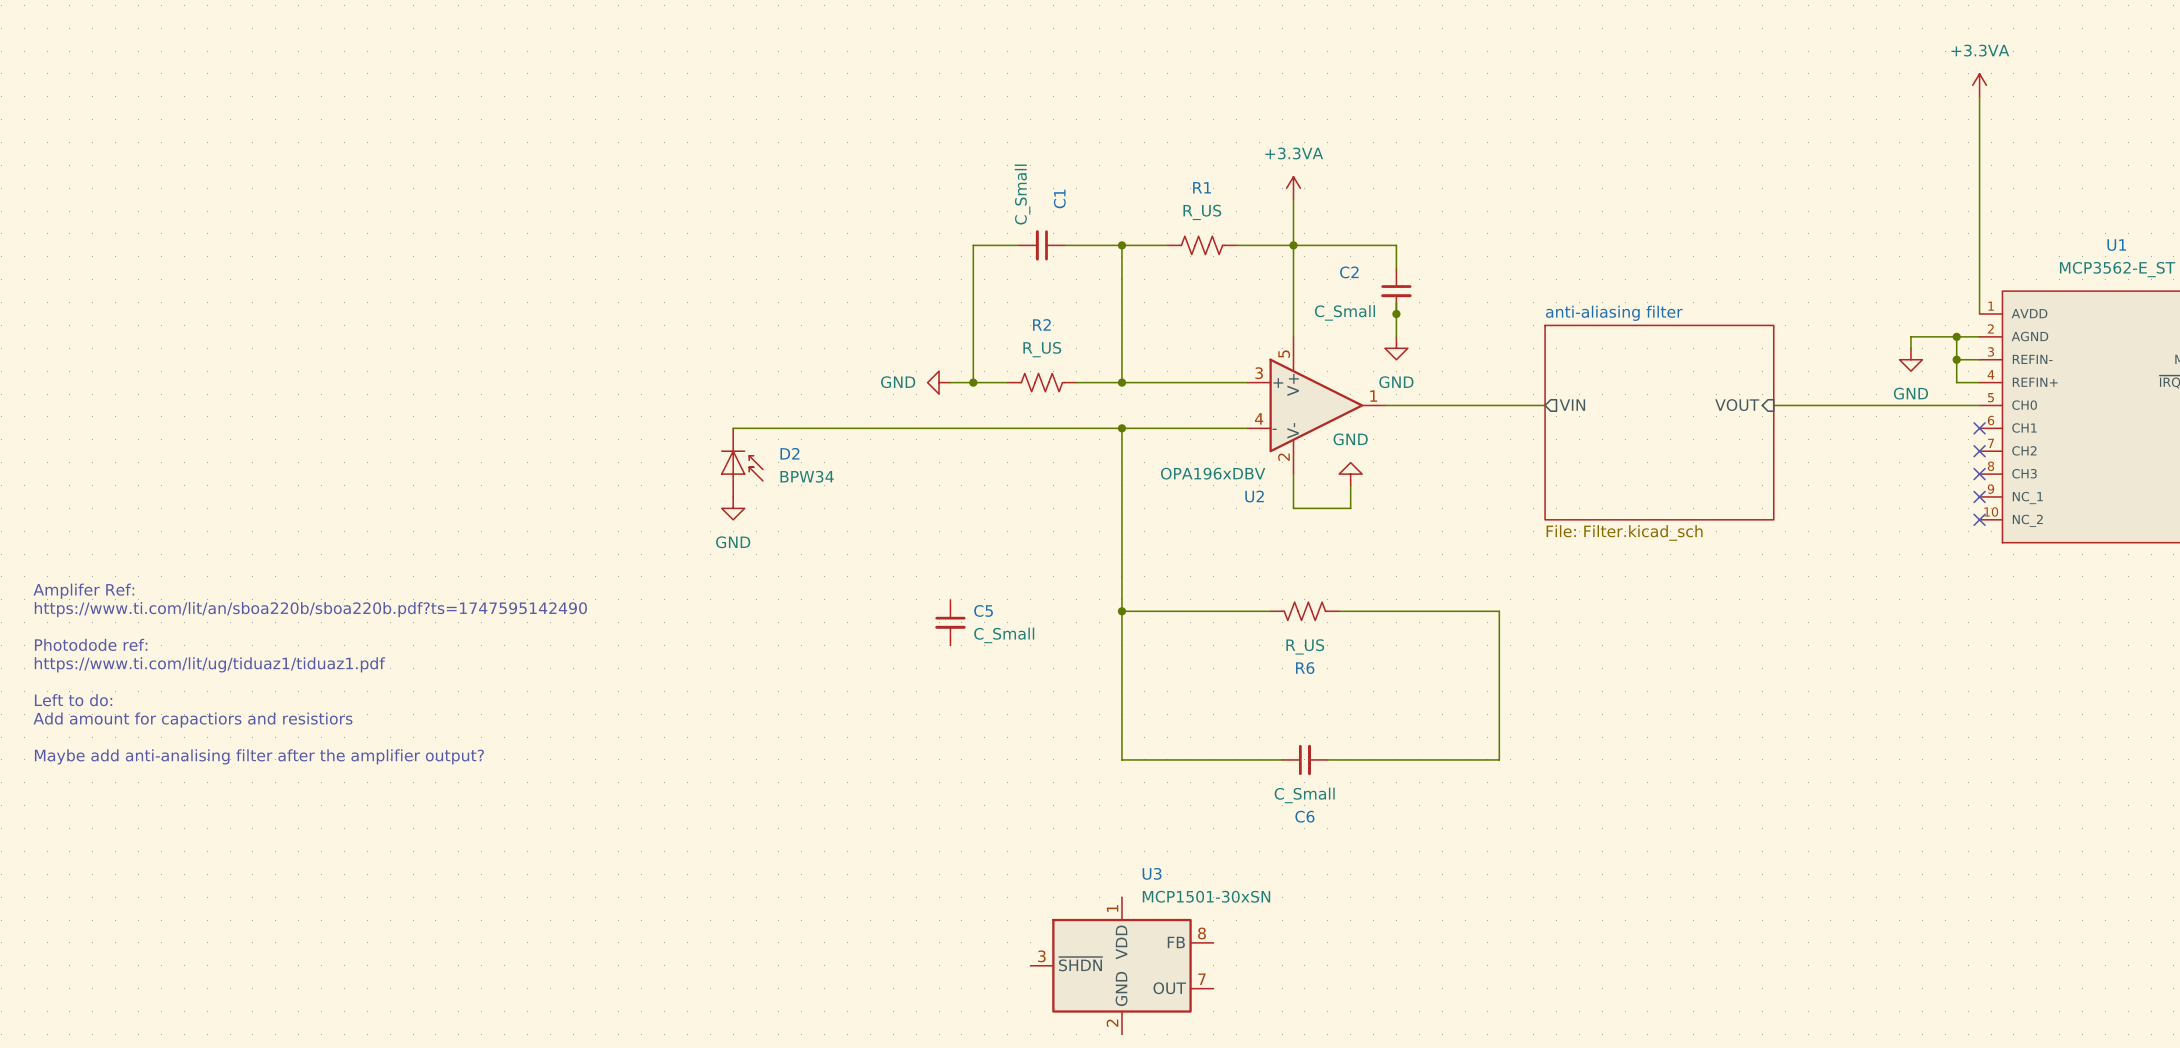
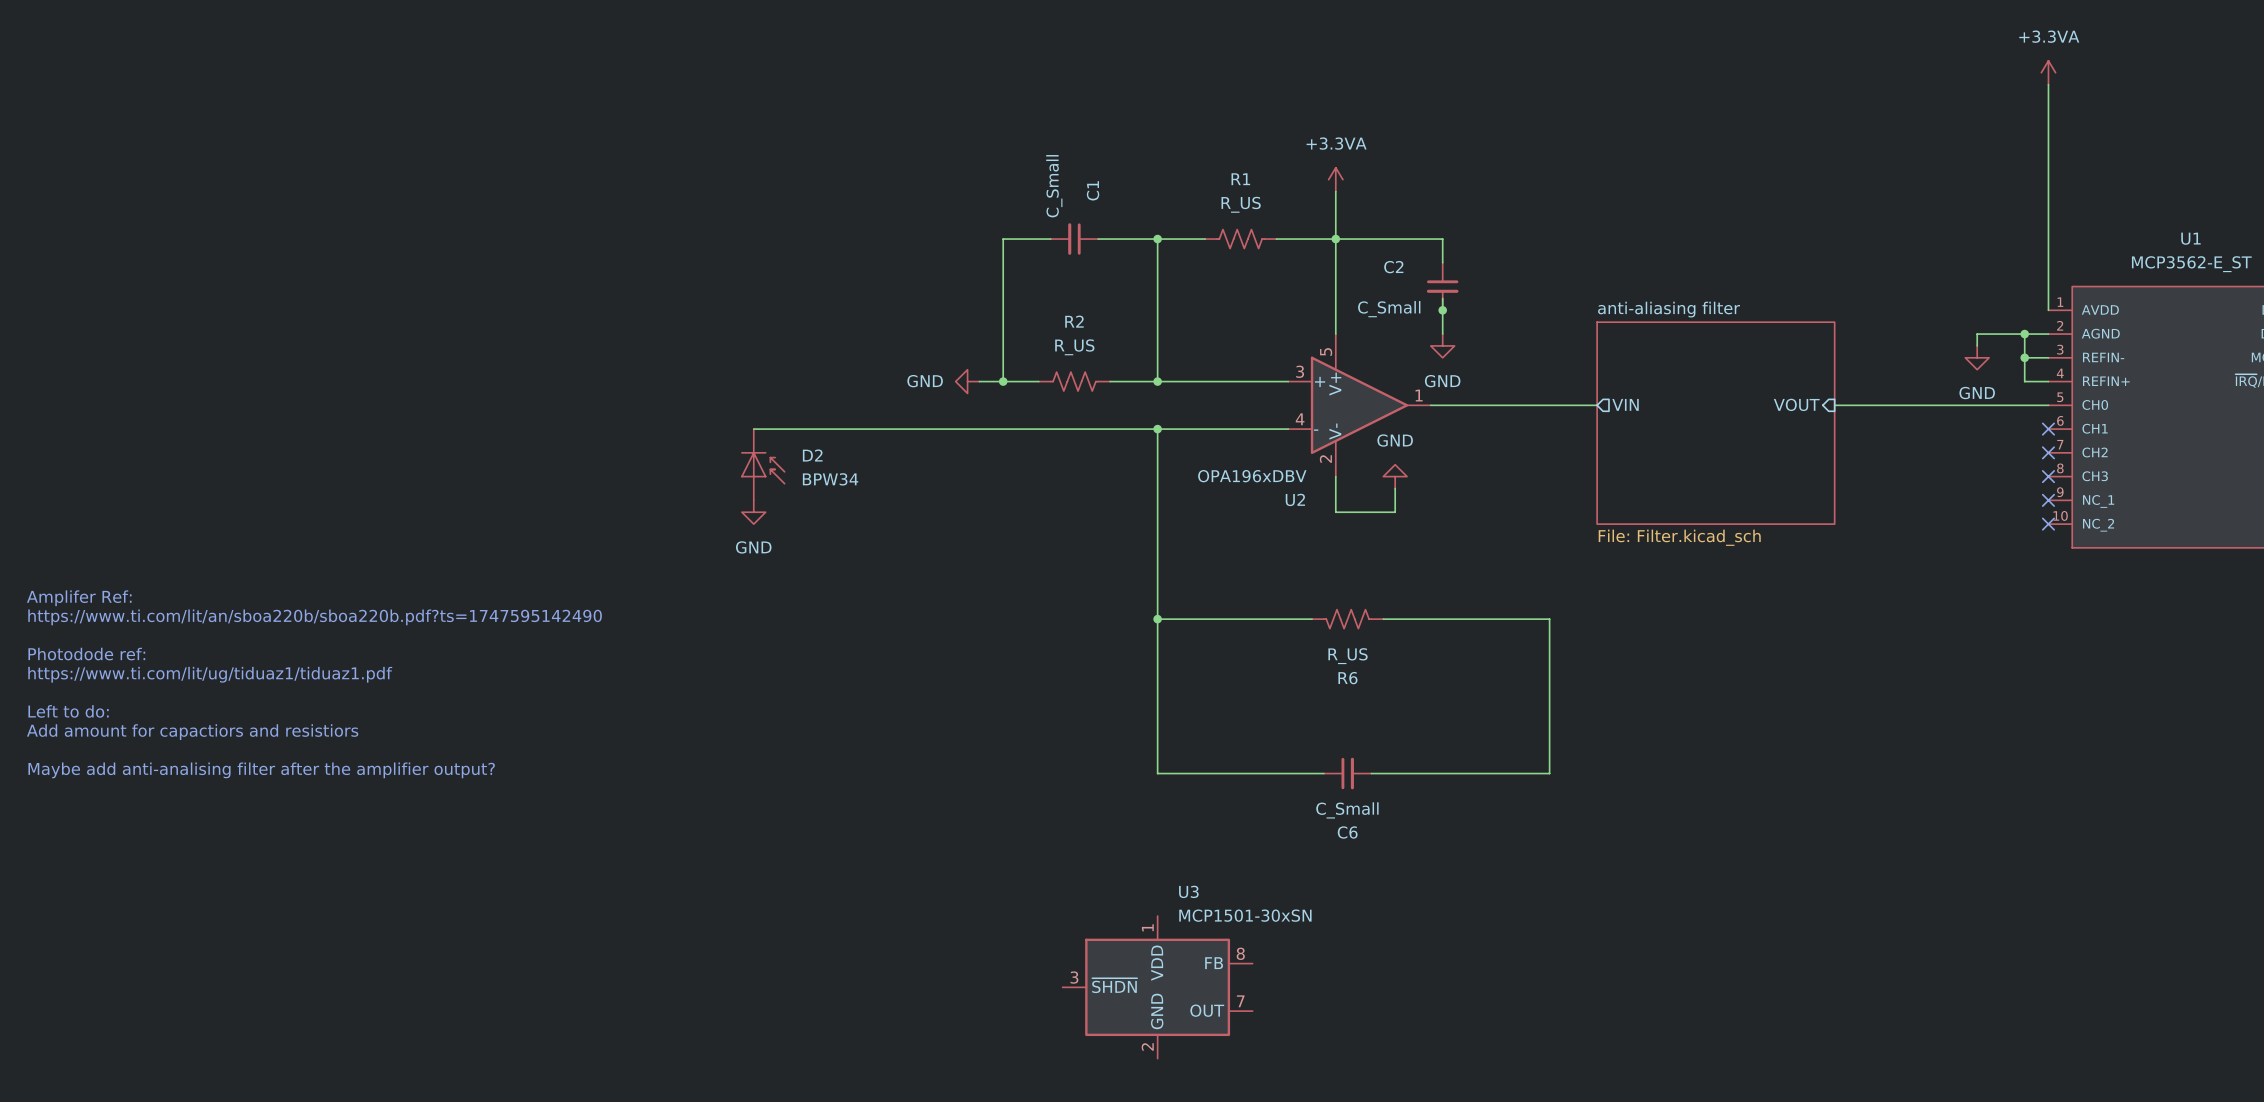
C5: C_Small (950, 622) -> none

